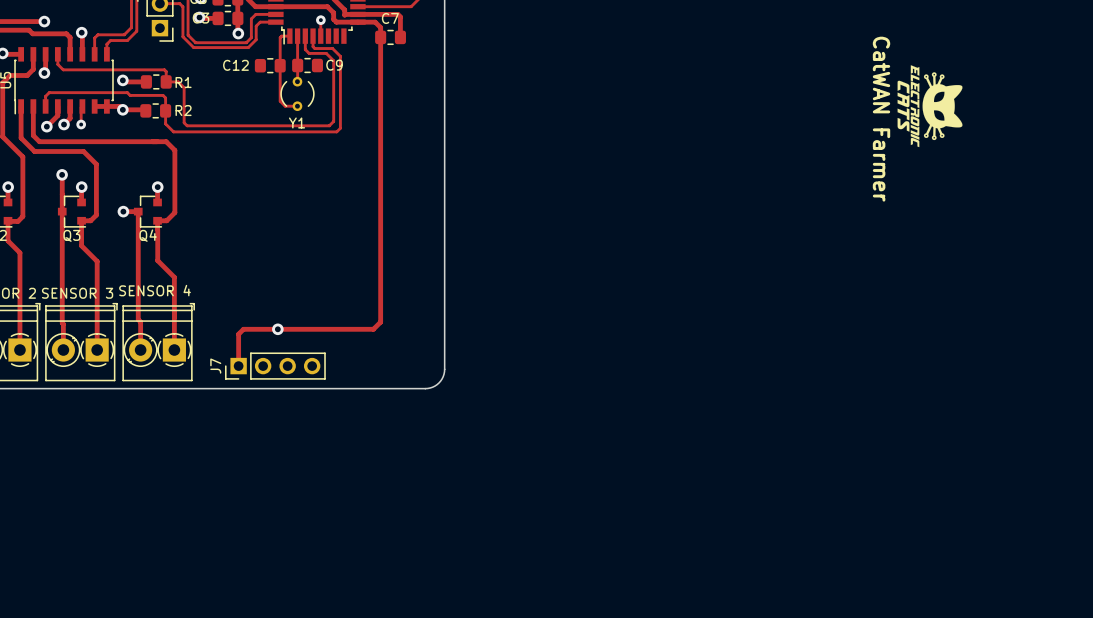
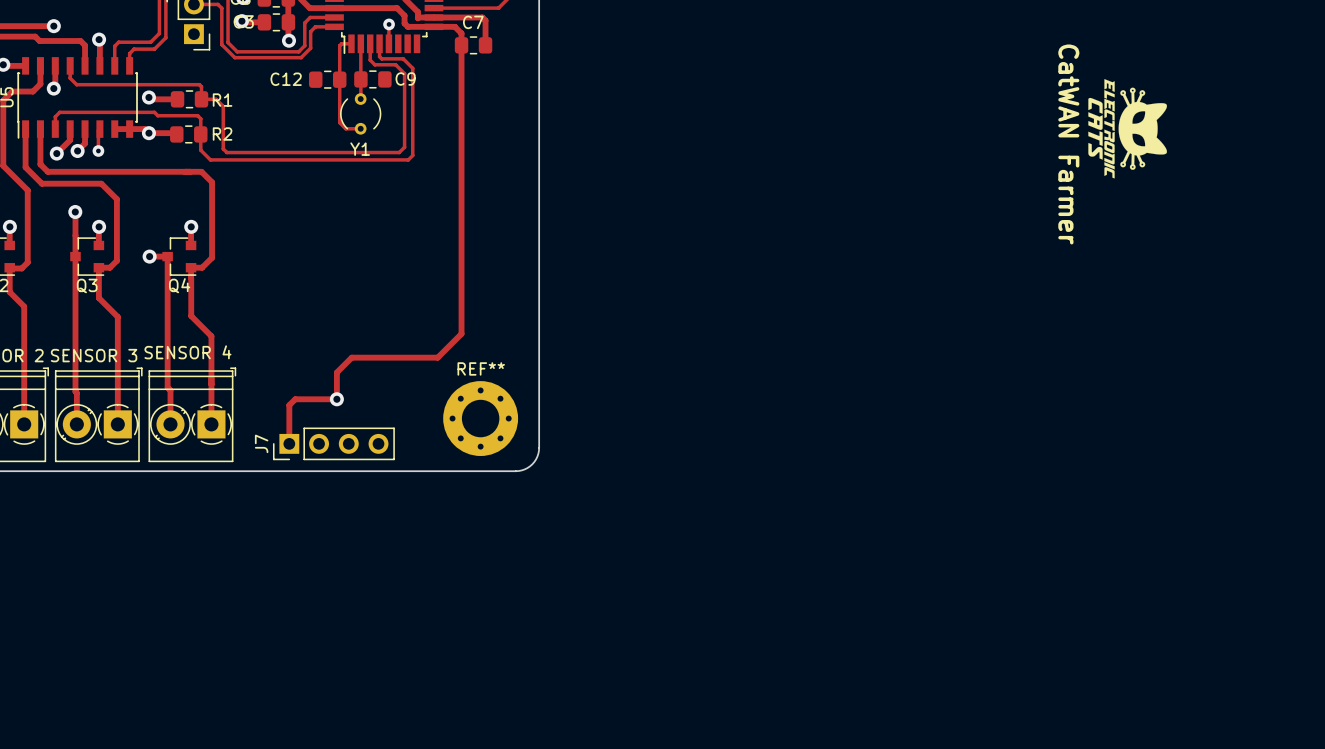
track: (380, 275) (380, 322) (373, 329) (277, 329) -> (461, 333) (437, 357) (351, 357) (336, 372) (336, 399)
REF**: none -> (480, 418)

